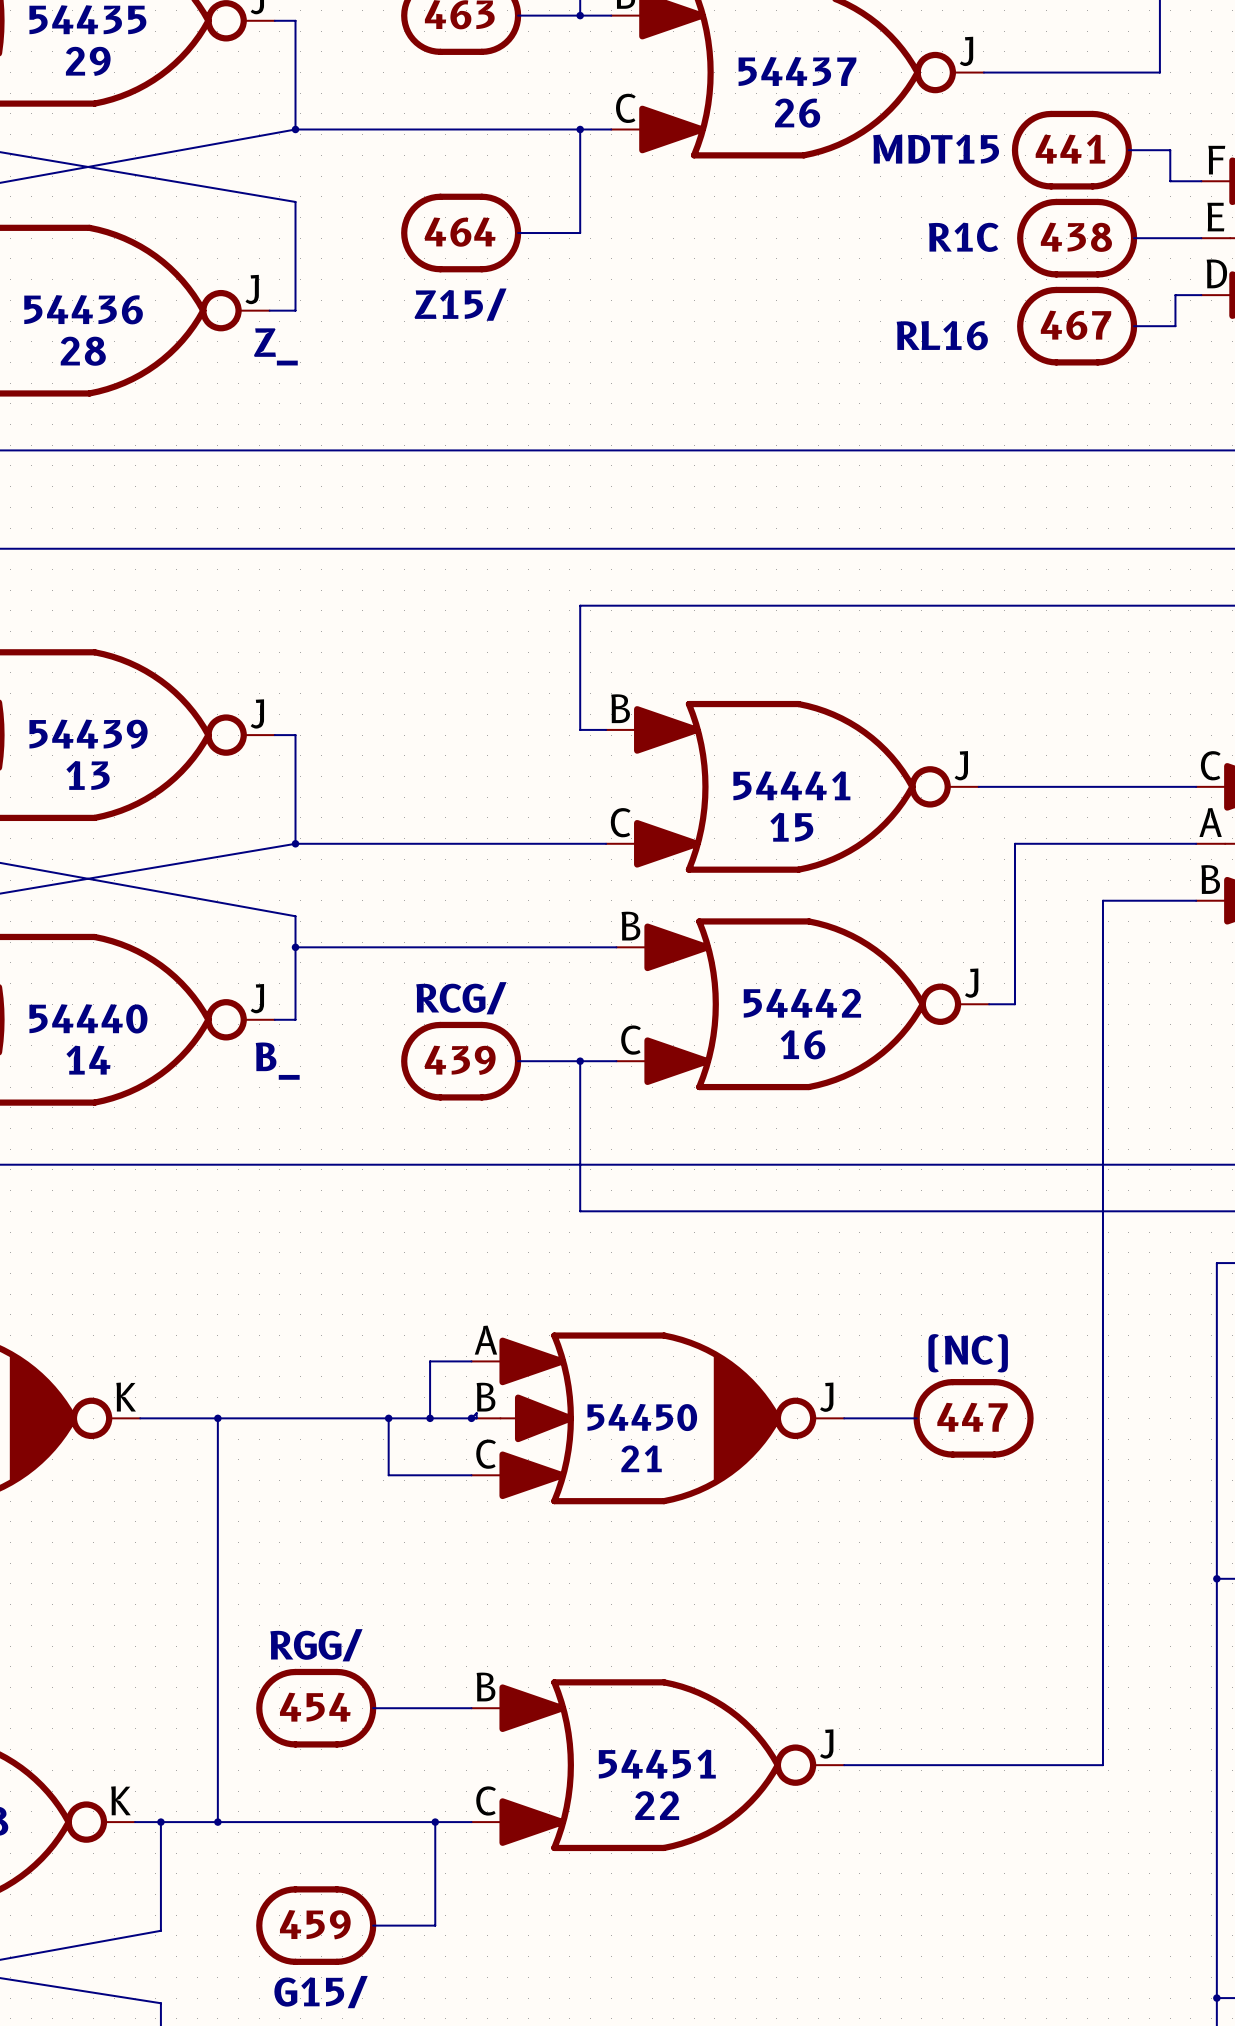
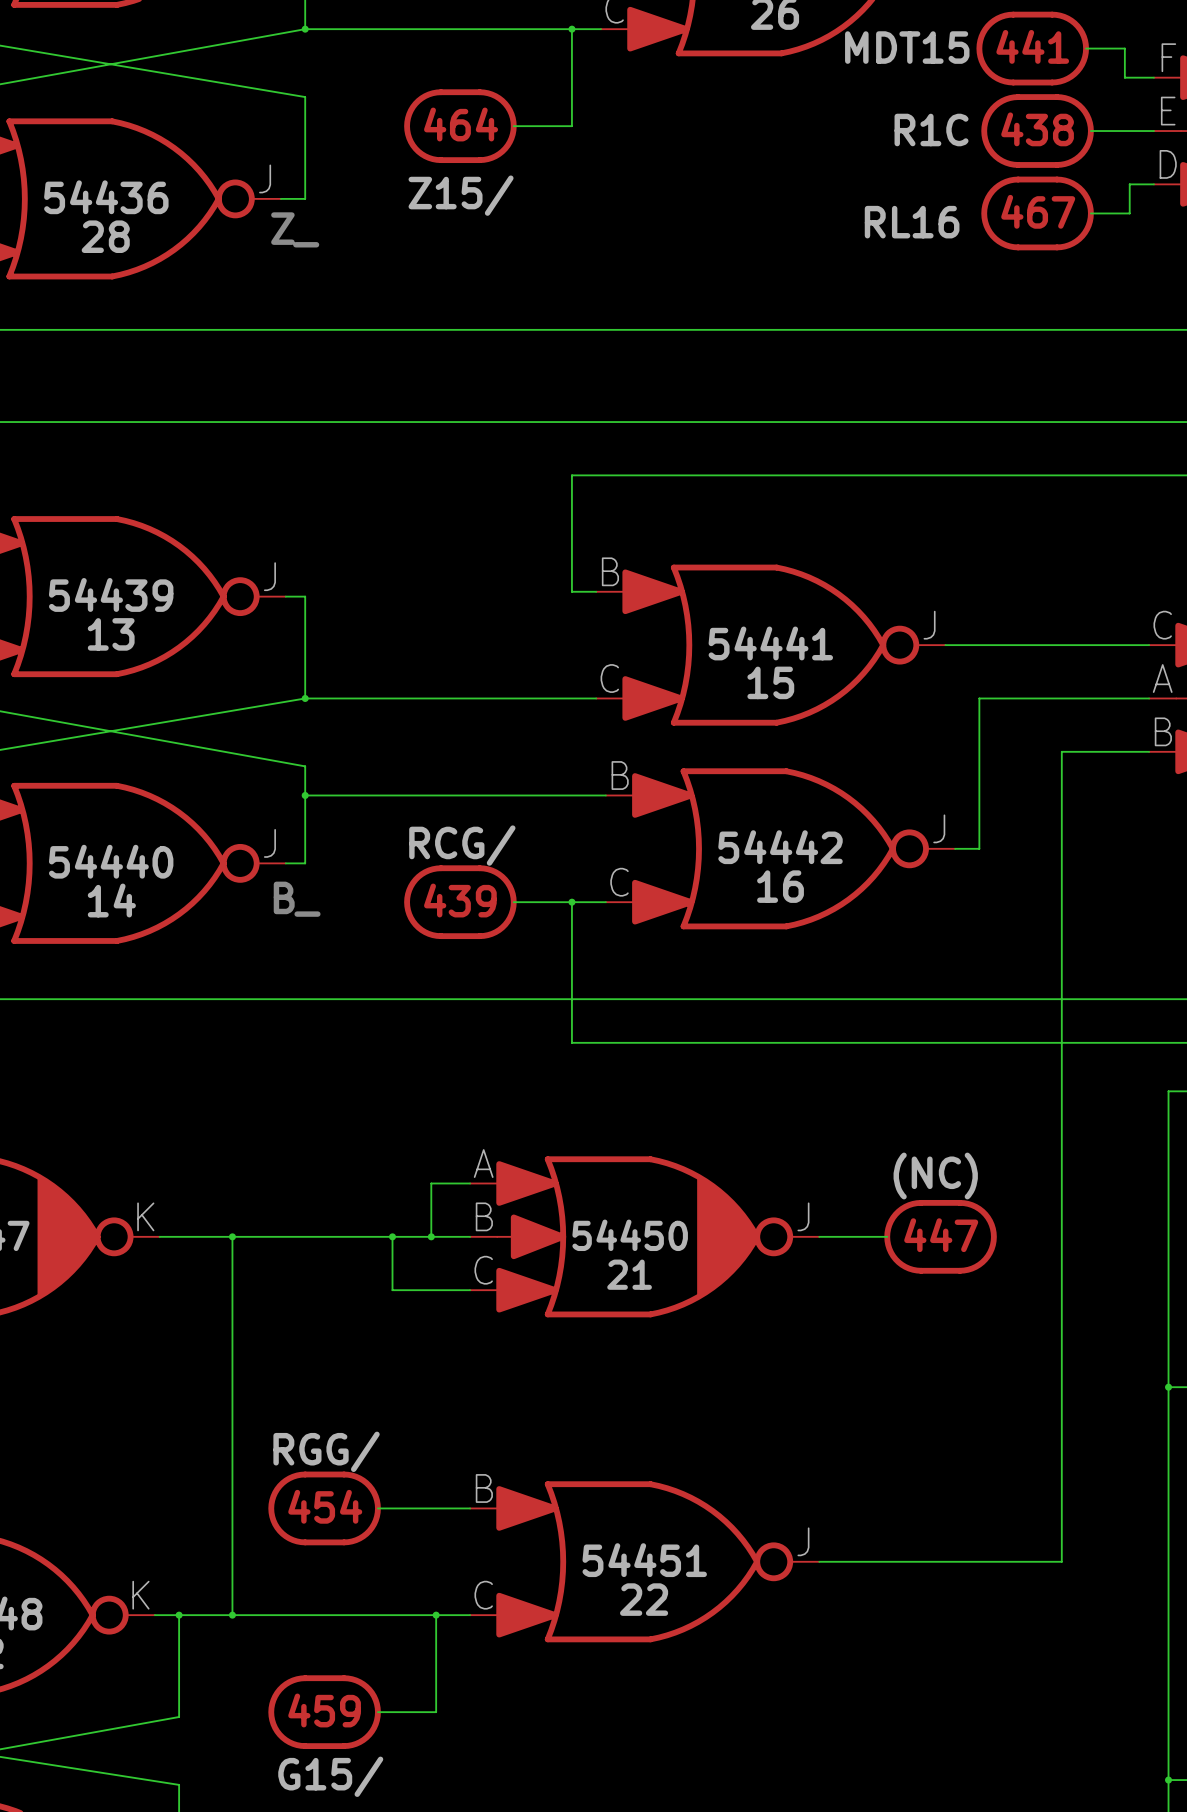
wire: (476, 1413) (476, 1418) (471, 1418) (476, 1413) -> none
junction: (471, 1418) -> none

